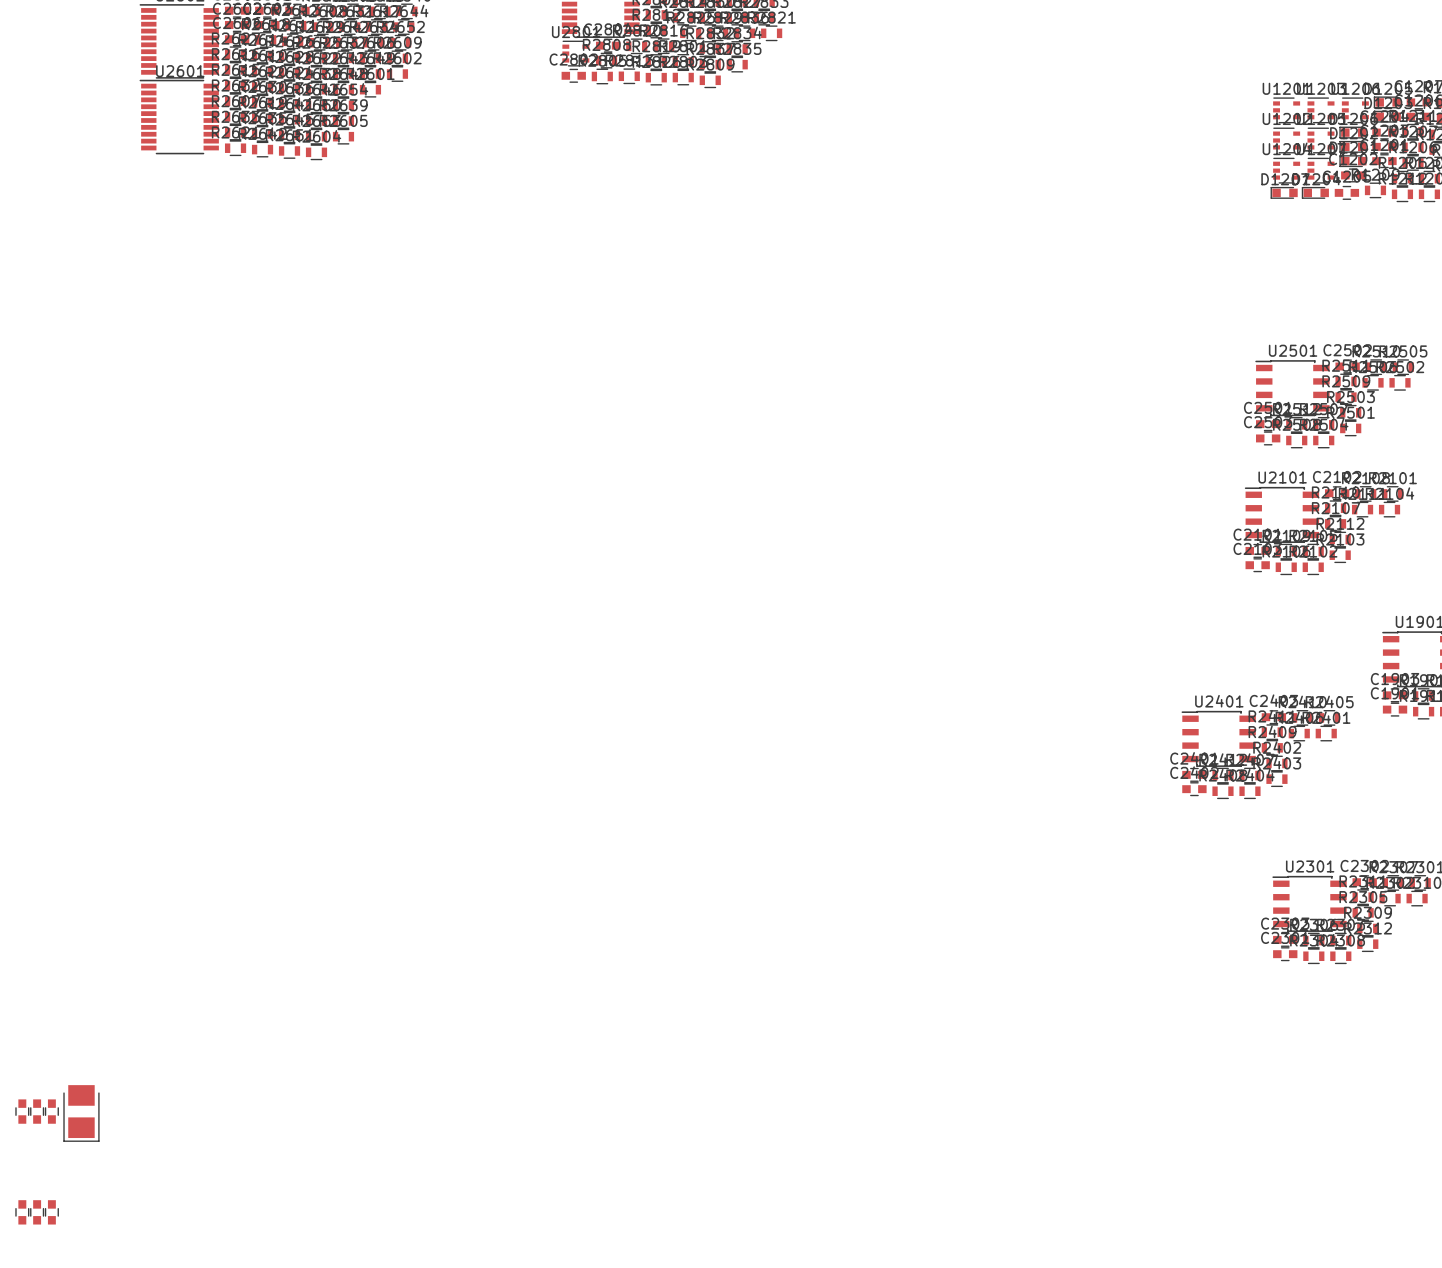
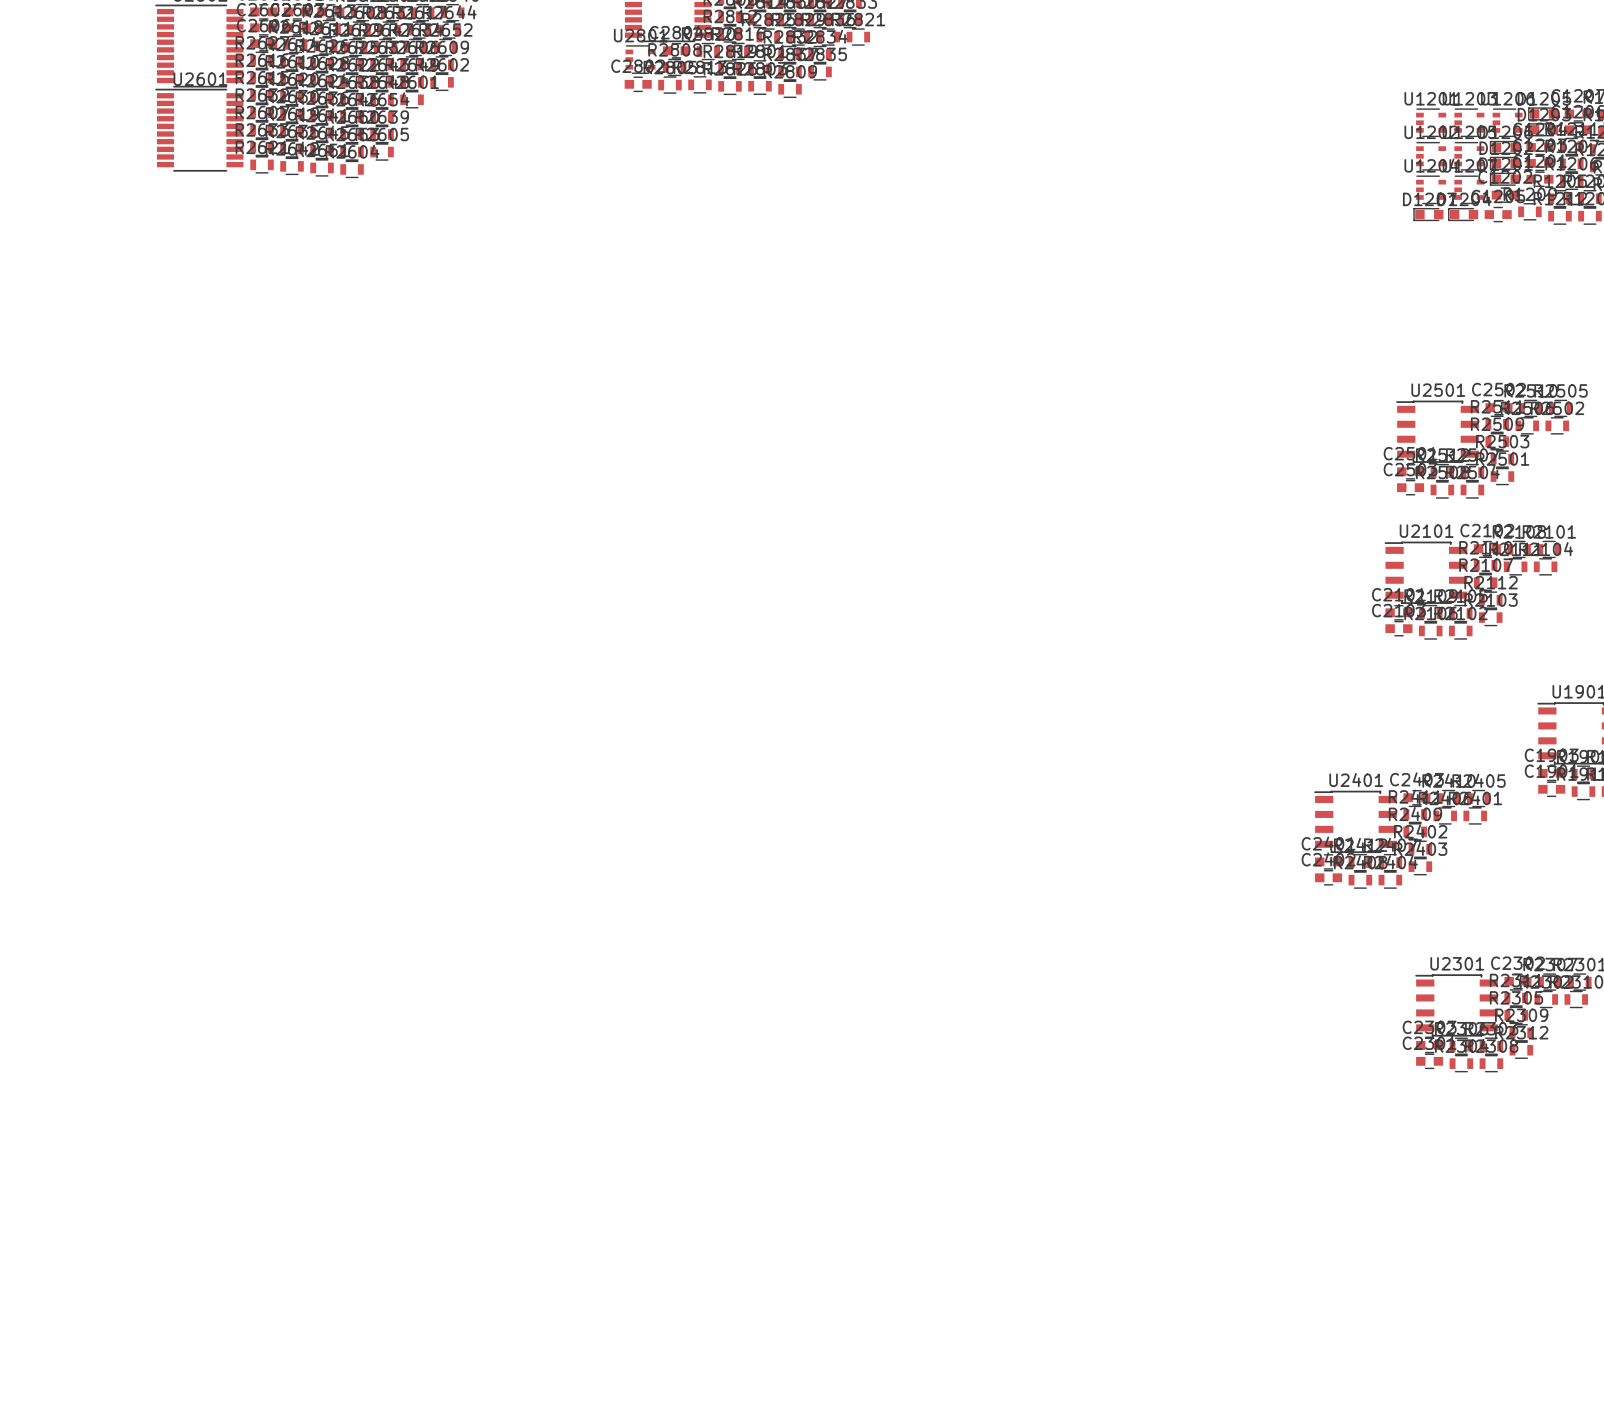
part: (22, 1111) -> none
part: (37, 1111) -> none
part: (51, 1111) -> none
part: (81, 1113) -> none
part: (22, 1212) -> none
part: (37, 1212) -> none
part: (51, 1212) -> none

